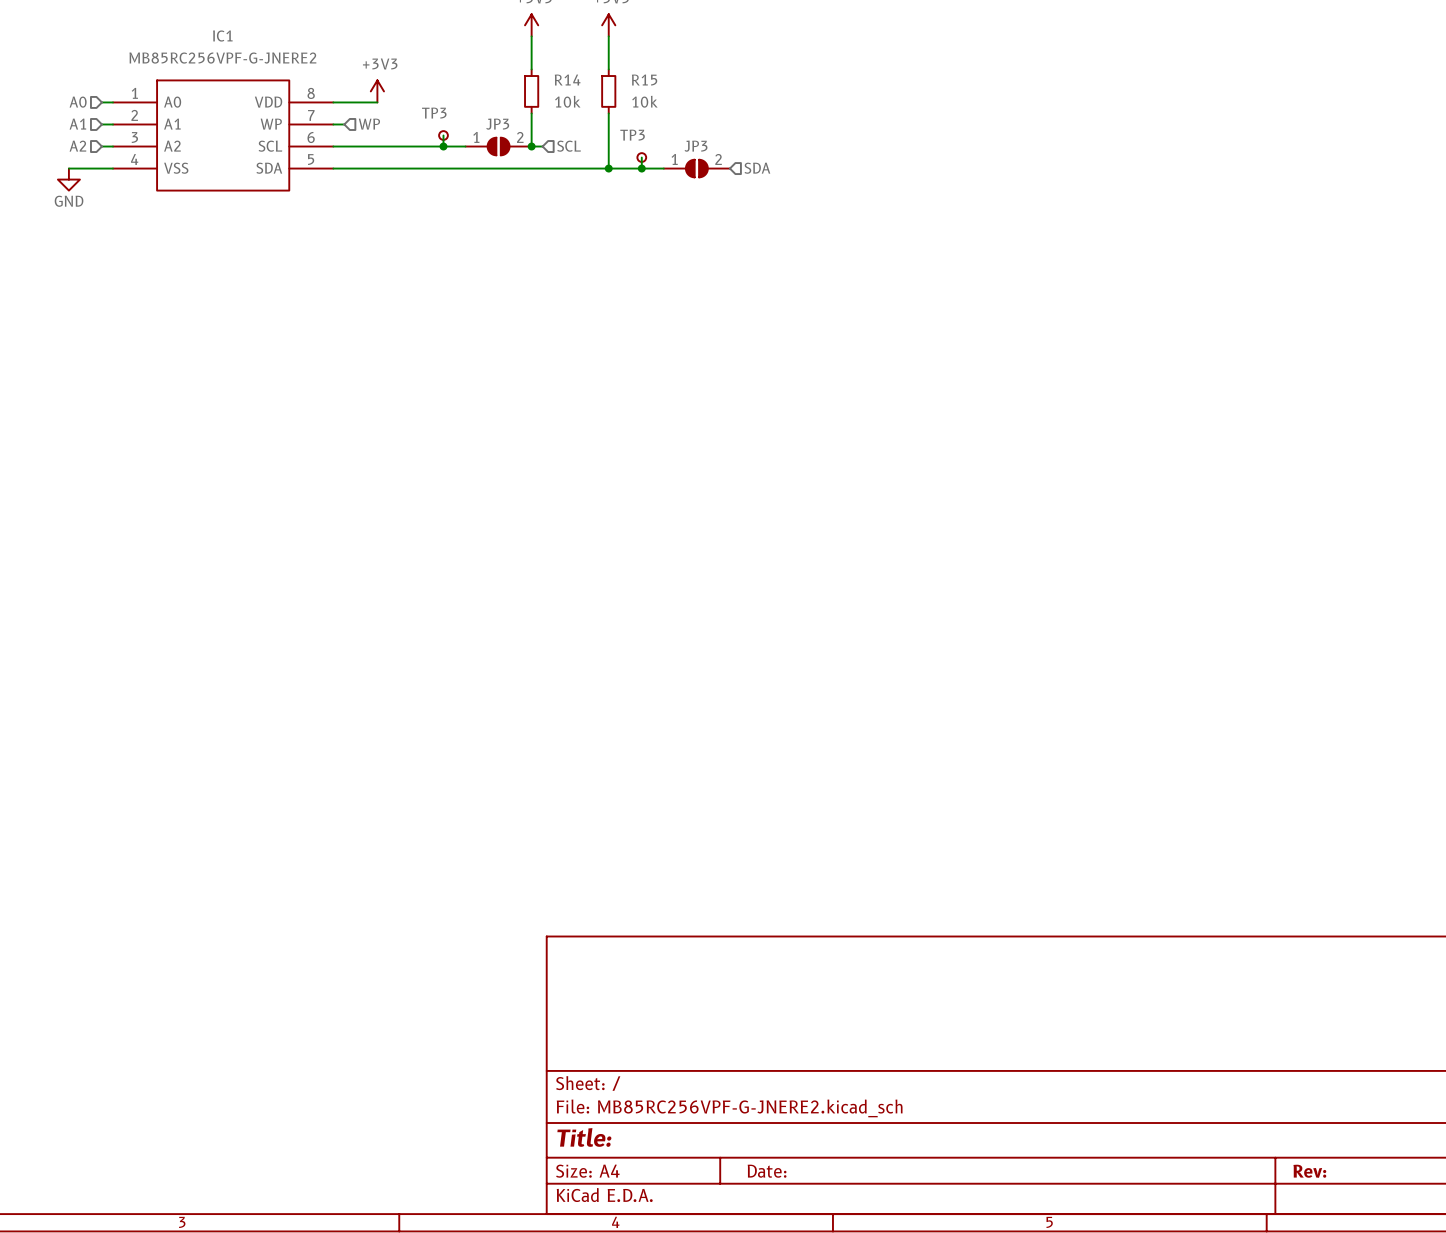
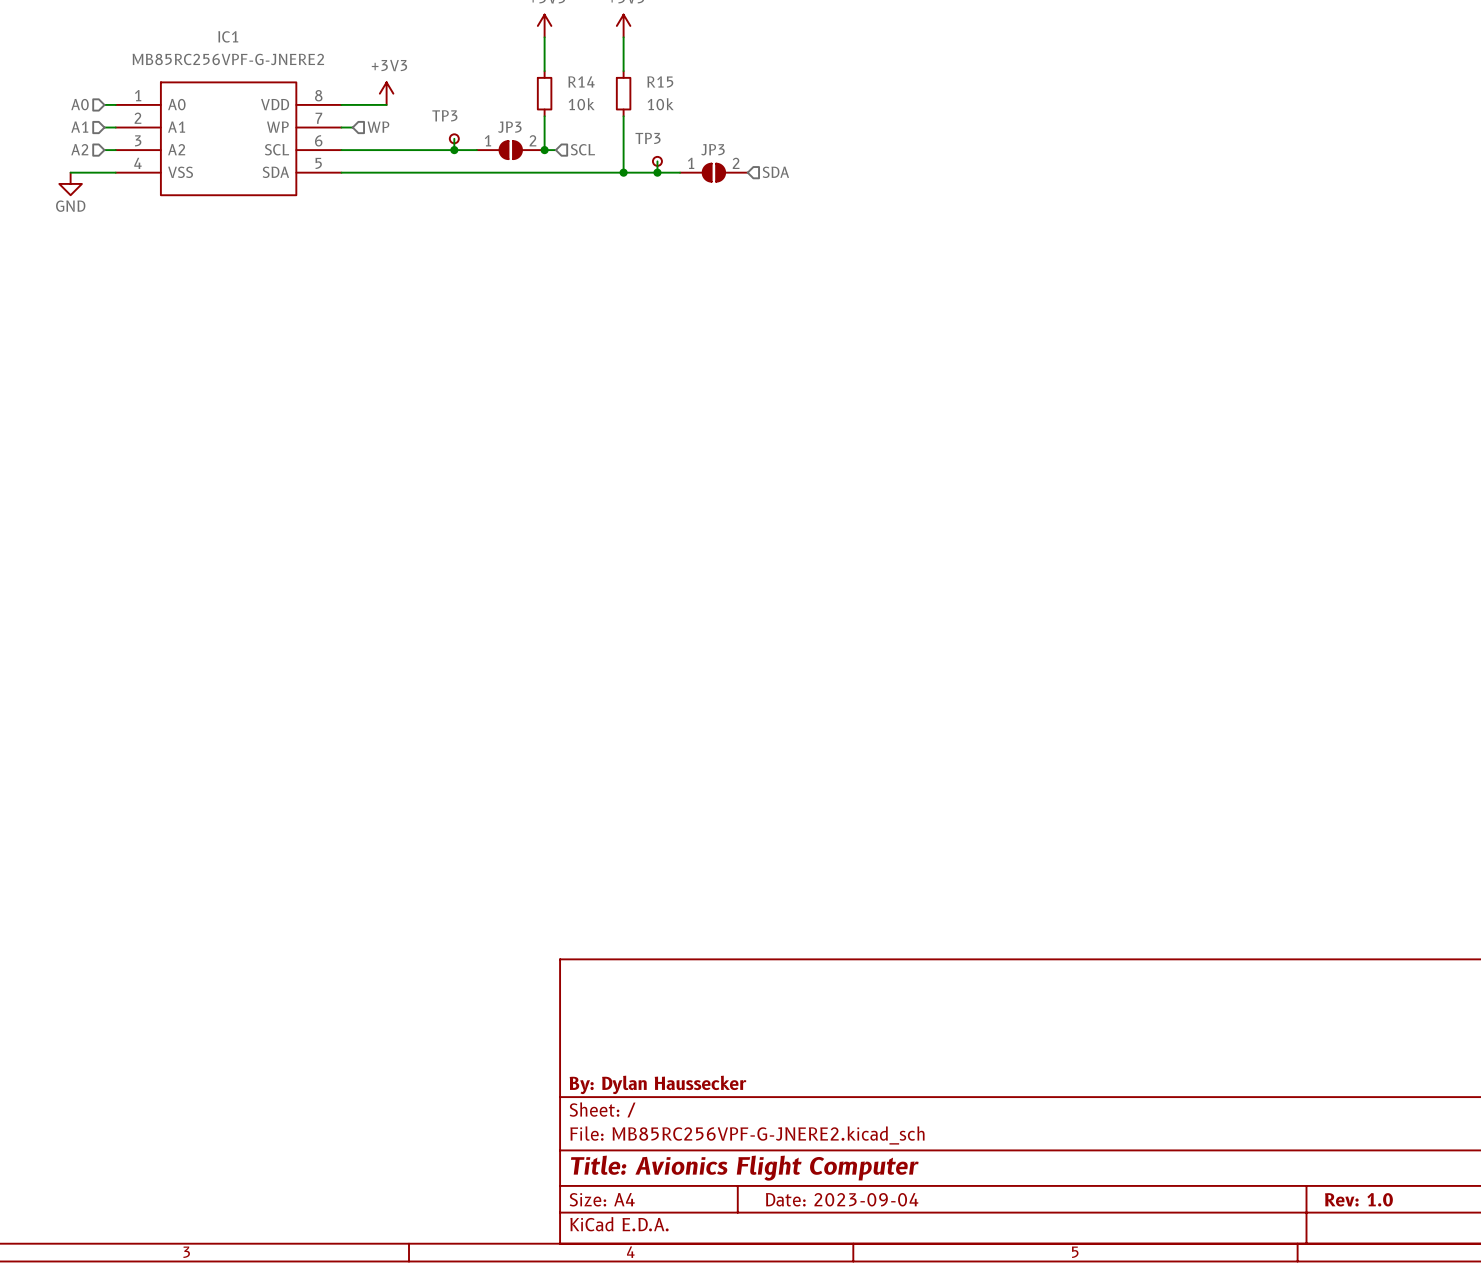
title block: none -> By: Dylan Haussecker (657, 1084)
title block: Title: (584, 1137) -> Title: Avionics Flight Computer (744, 1168)
title block: Date: (767, 1171) -> Date: 2023-09-04 (842, 1199)
title block: Rev: (1309, 1171) -> Rev: 1.0 (1358, 1199)

